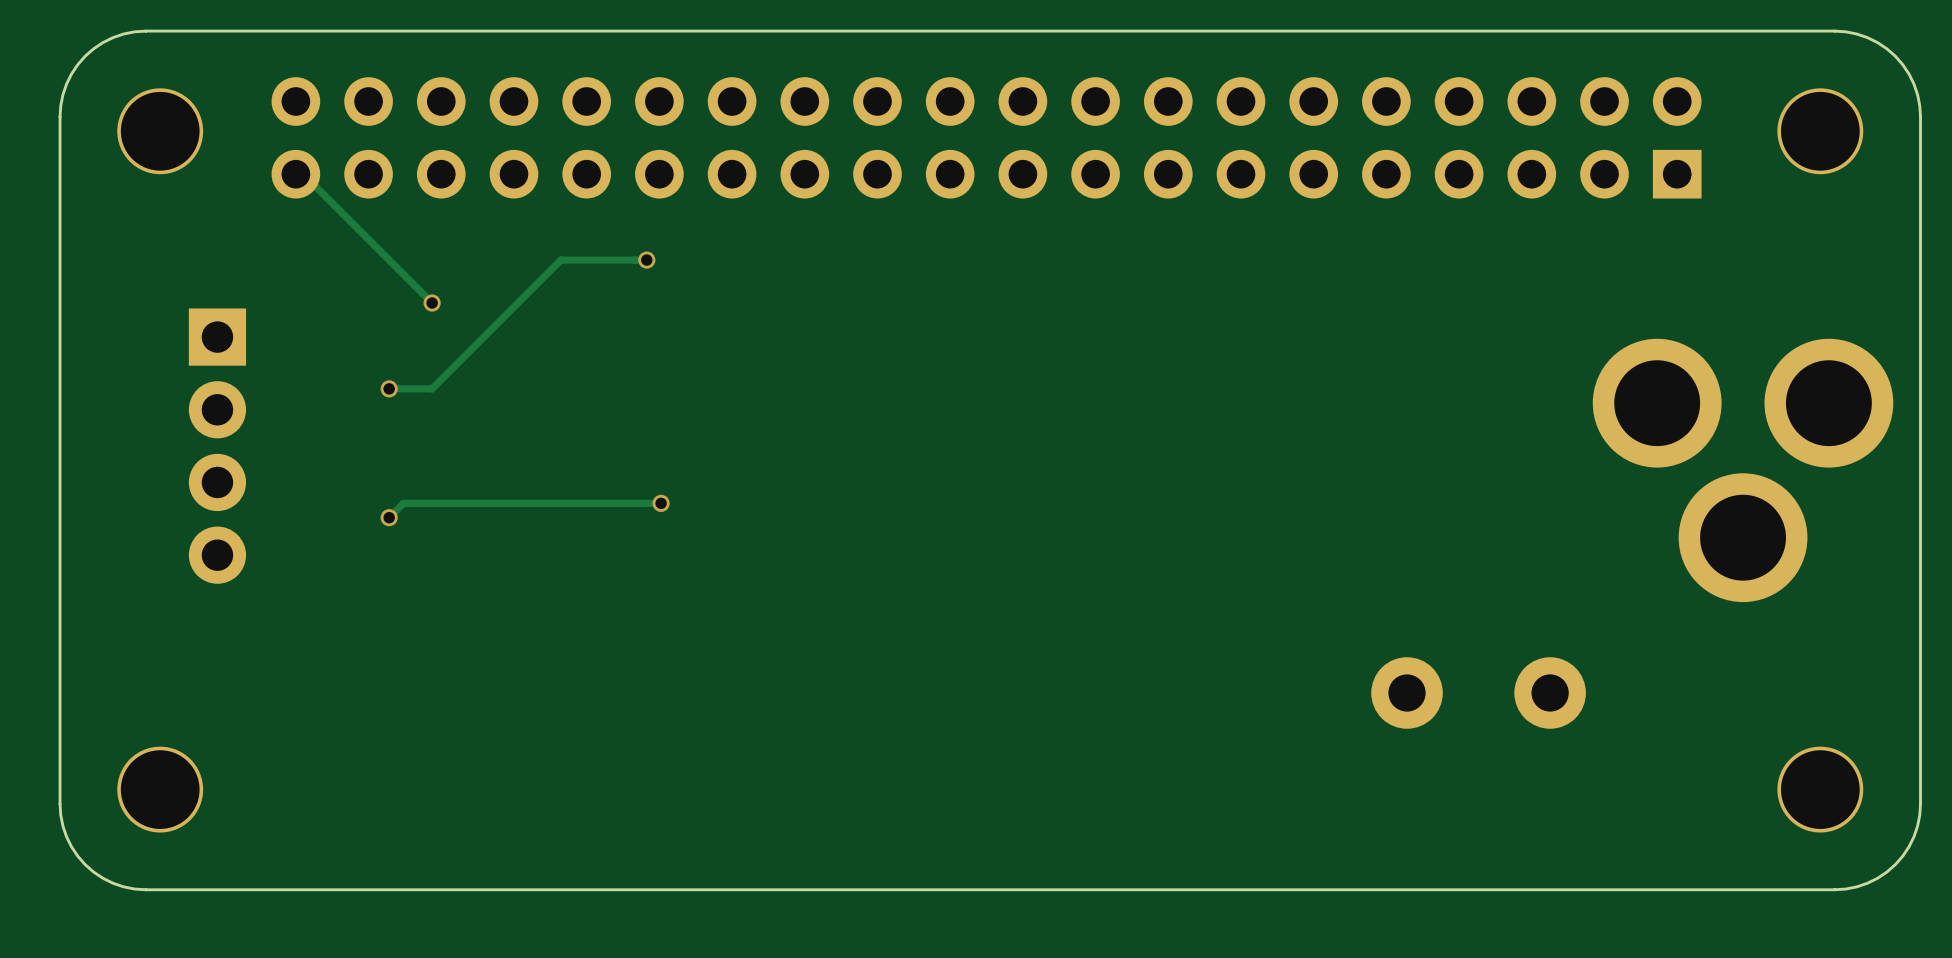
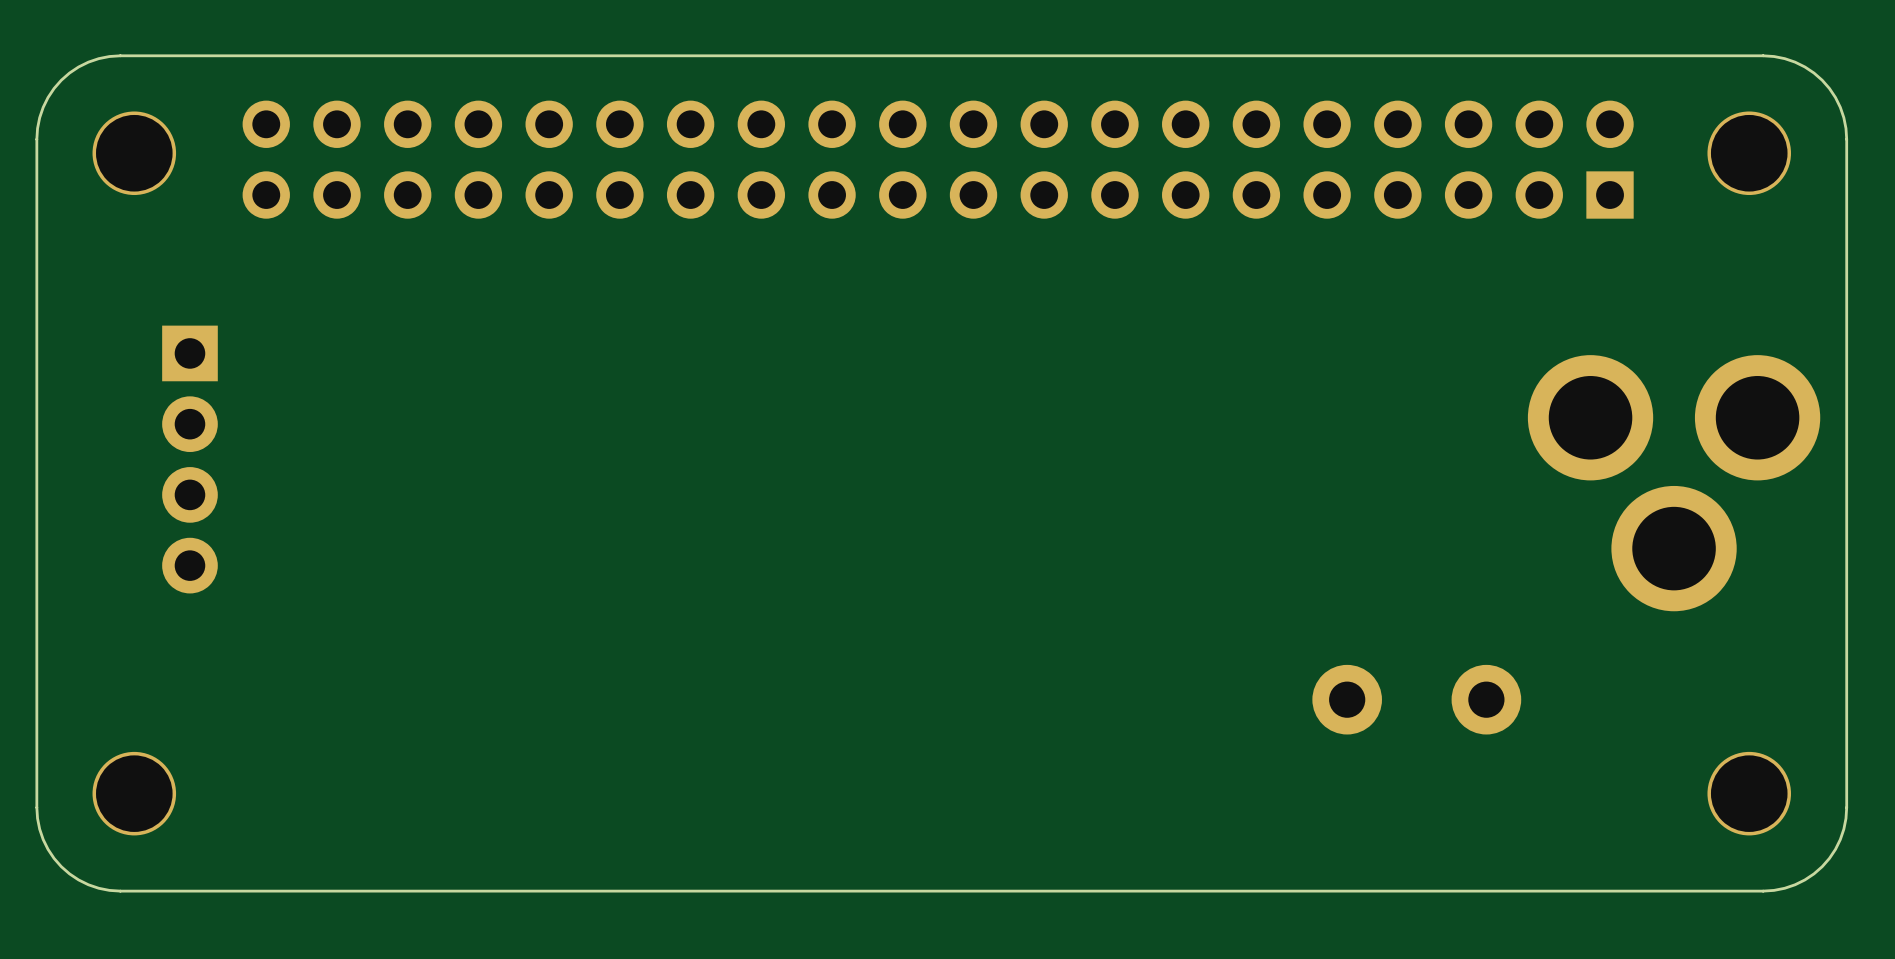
track: (295, 174) (303, 174) (432, 303) -> none
track: (646, 260) (560, 260) (432, 388) (389, 388) -> none
via: (646, 260) -> none
via: (432, 303) -> none
via: (389, 388) -> none
track: (661, 503) (403, 503) (389, 517) -> none
via: (661, 503) -> none
via: (389, 517) -> none

